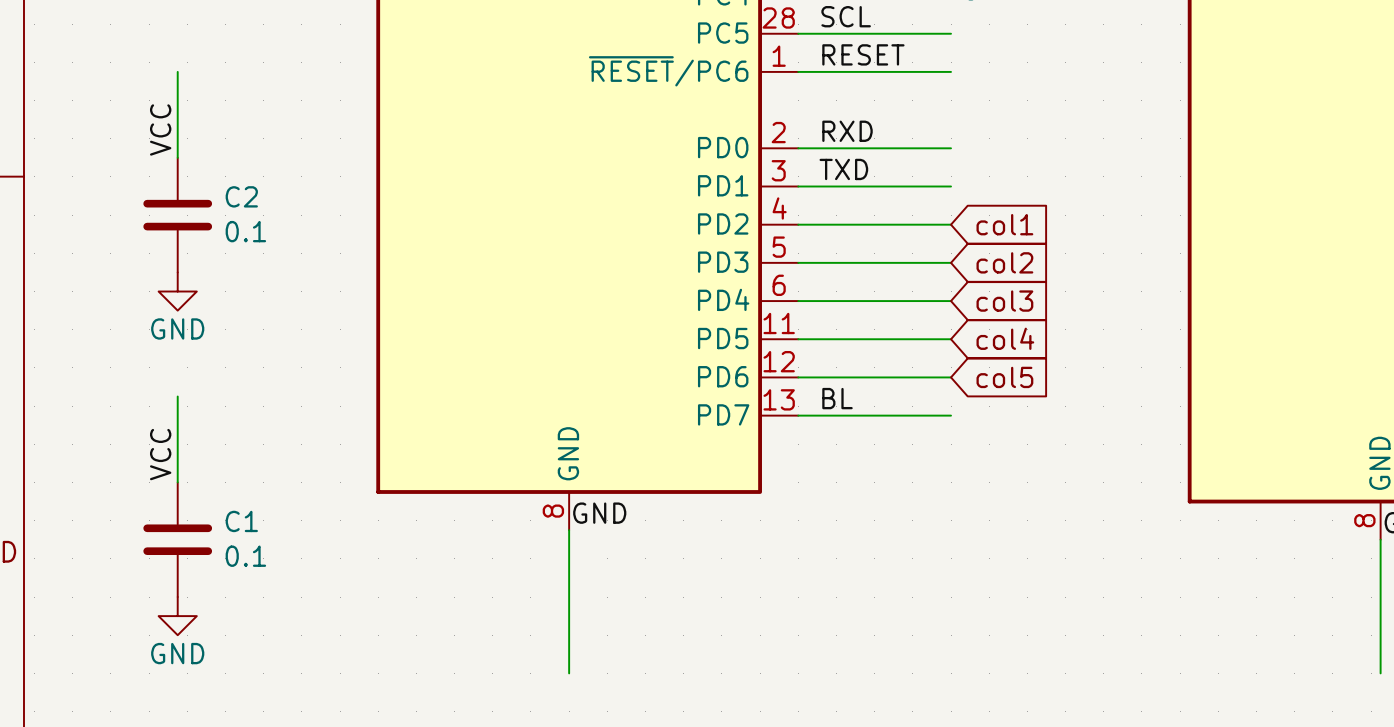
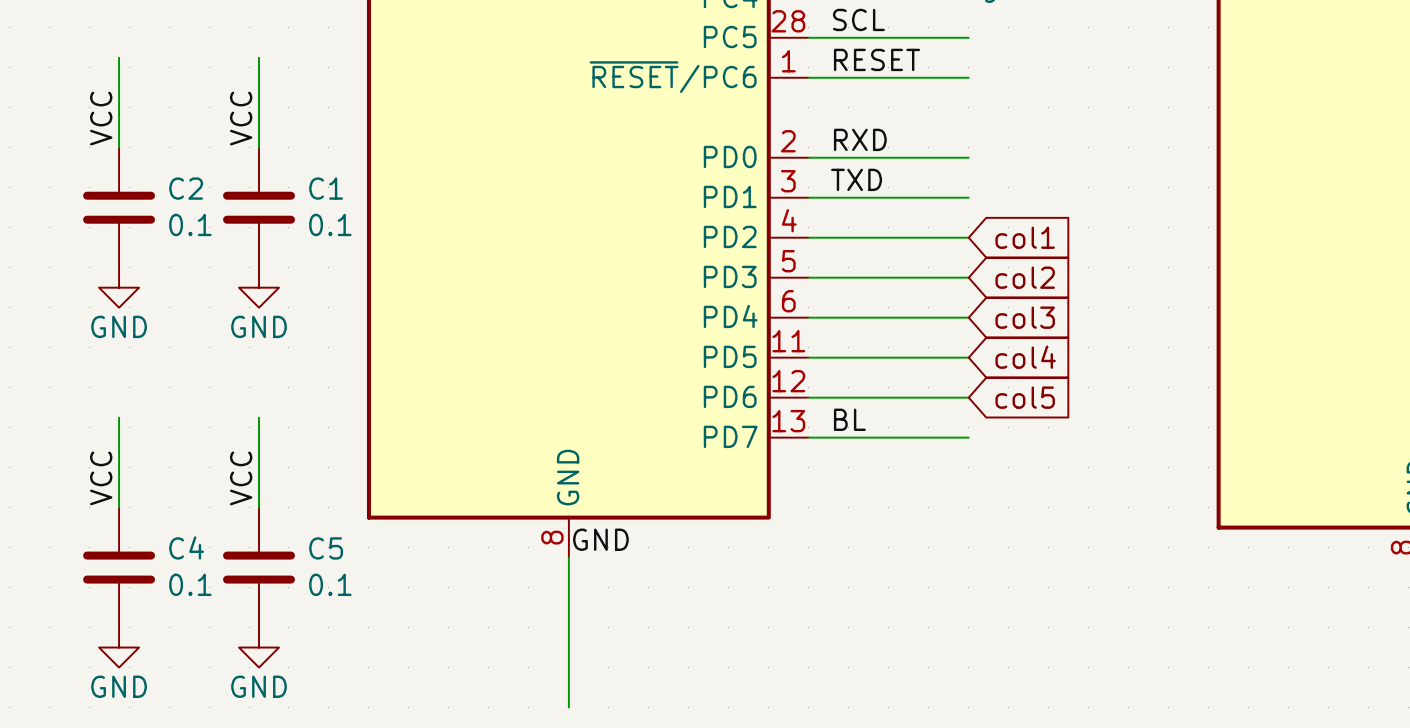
wire: none -> (259, 57) (259, 147)
wire: (177, 71) (177, 157) -> (119, 57) (119, 147)
label: none -> VCC (241, 118)
label position: VCC (160, 129) -> VCC (101, 118)
C2 position: (177, 215) -> (119, 207)
power symbol: none -> GND (259, 287)
power symbol position: GND (177, 291) -> GND (119, 287)
wire: (177, 396) (177, 482) -> (119, 417) (119, 507)
wire: none -> (259, 417) (259, 507)
label position: VCC (160, 454) -> VCC (101, 478)
label: none -> VCC (241, 478)
C4: none -> 0.1 (119, 567)
C1 position: (177, 539) -> (259, 207)
C5: none -> 0.1 (259, 567)
power symbol position: GND (177, 616) -> GND (119, 647)
power symbol: none -> GND (259, 647)

